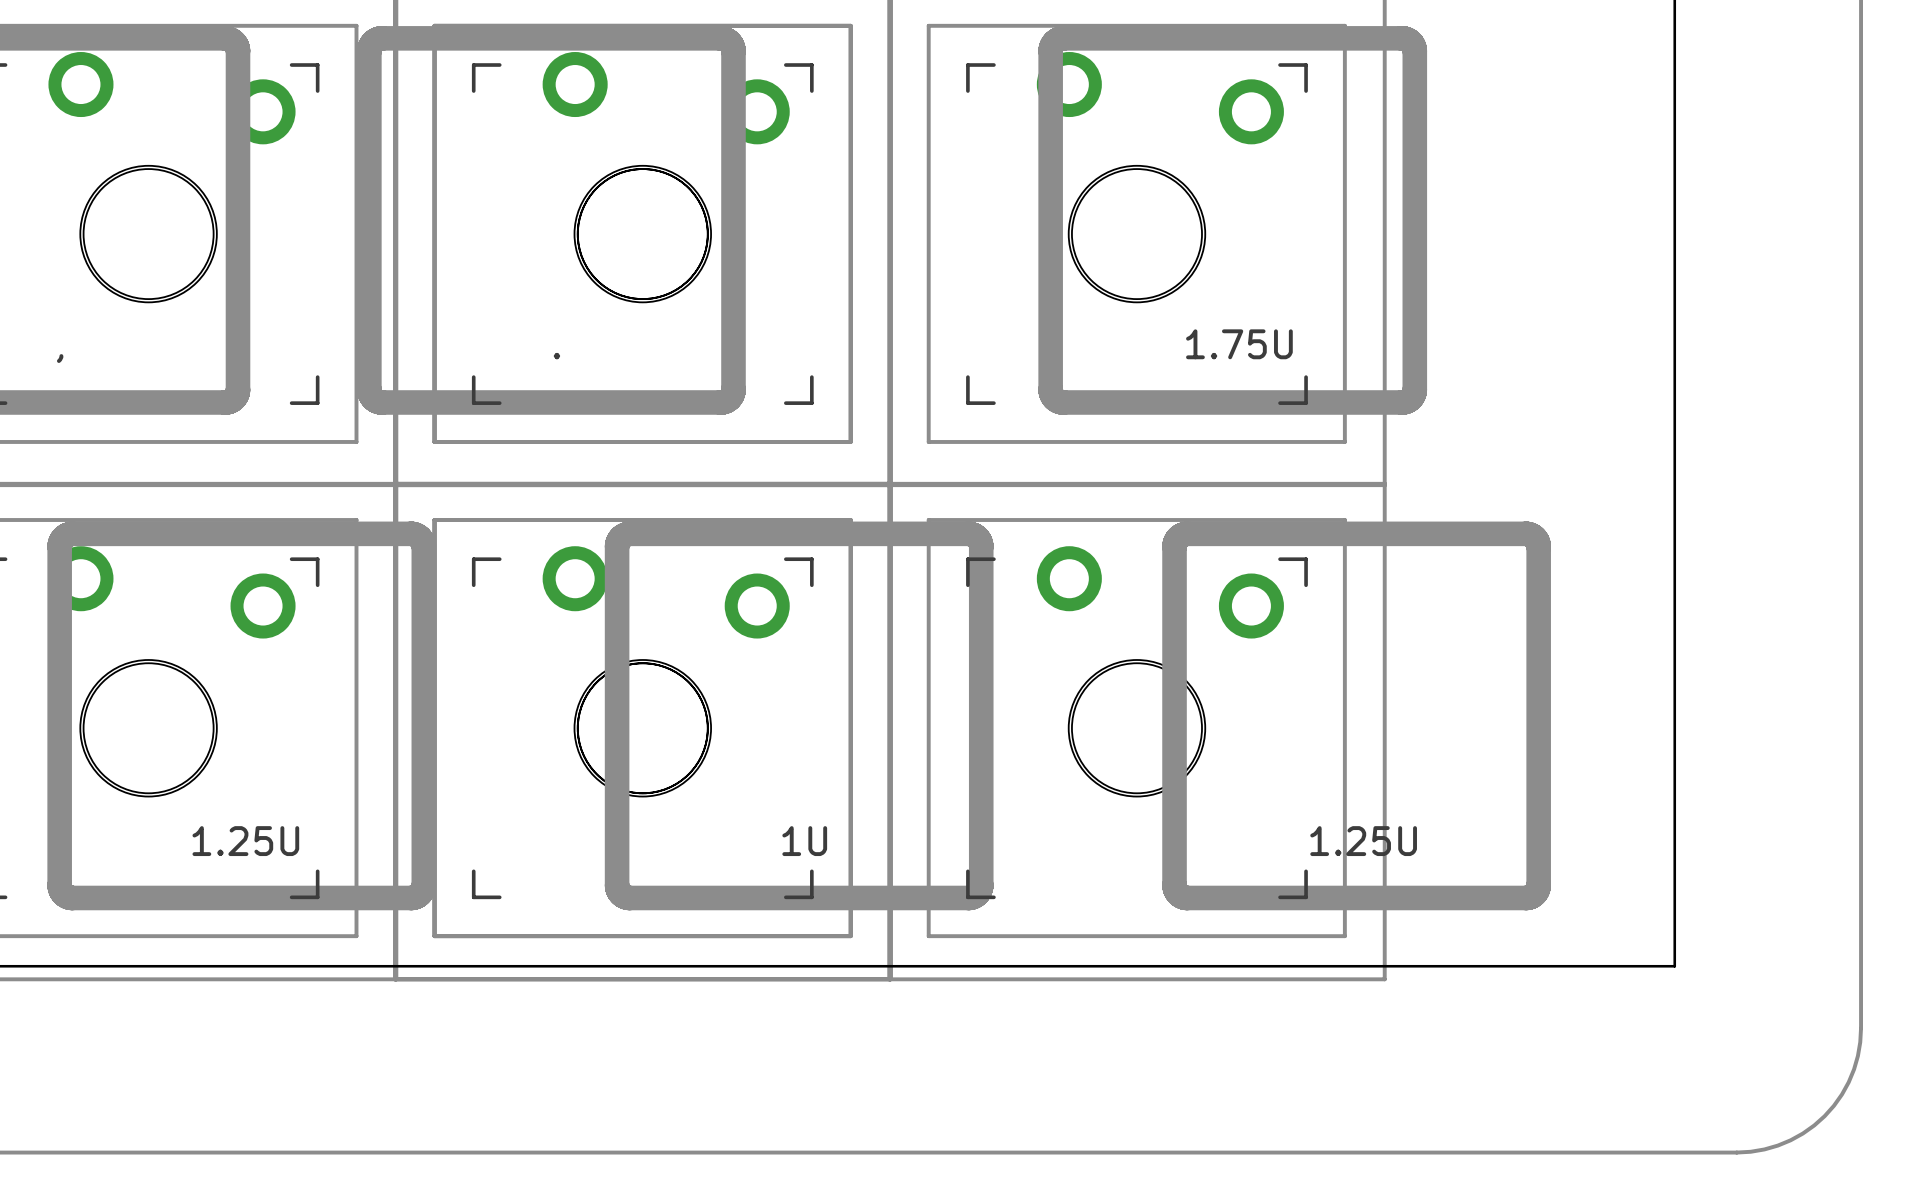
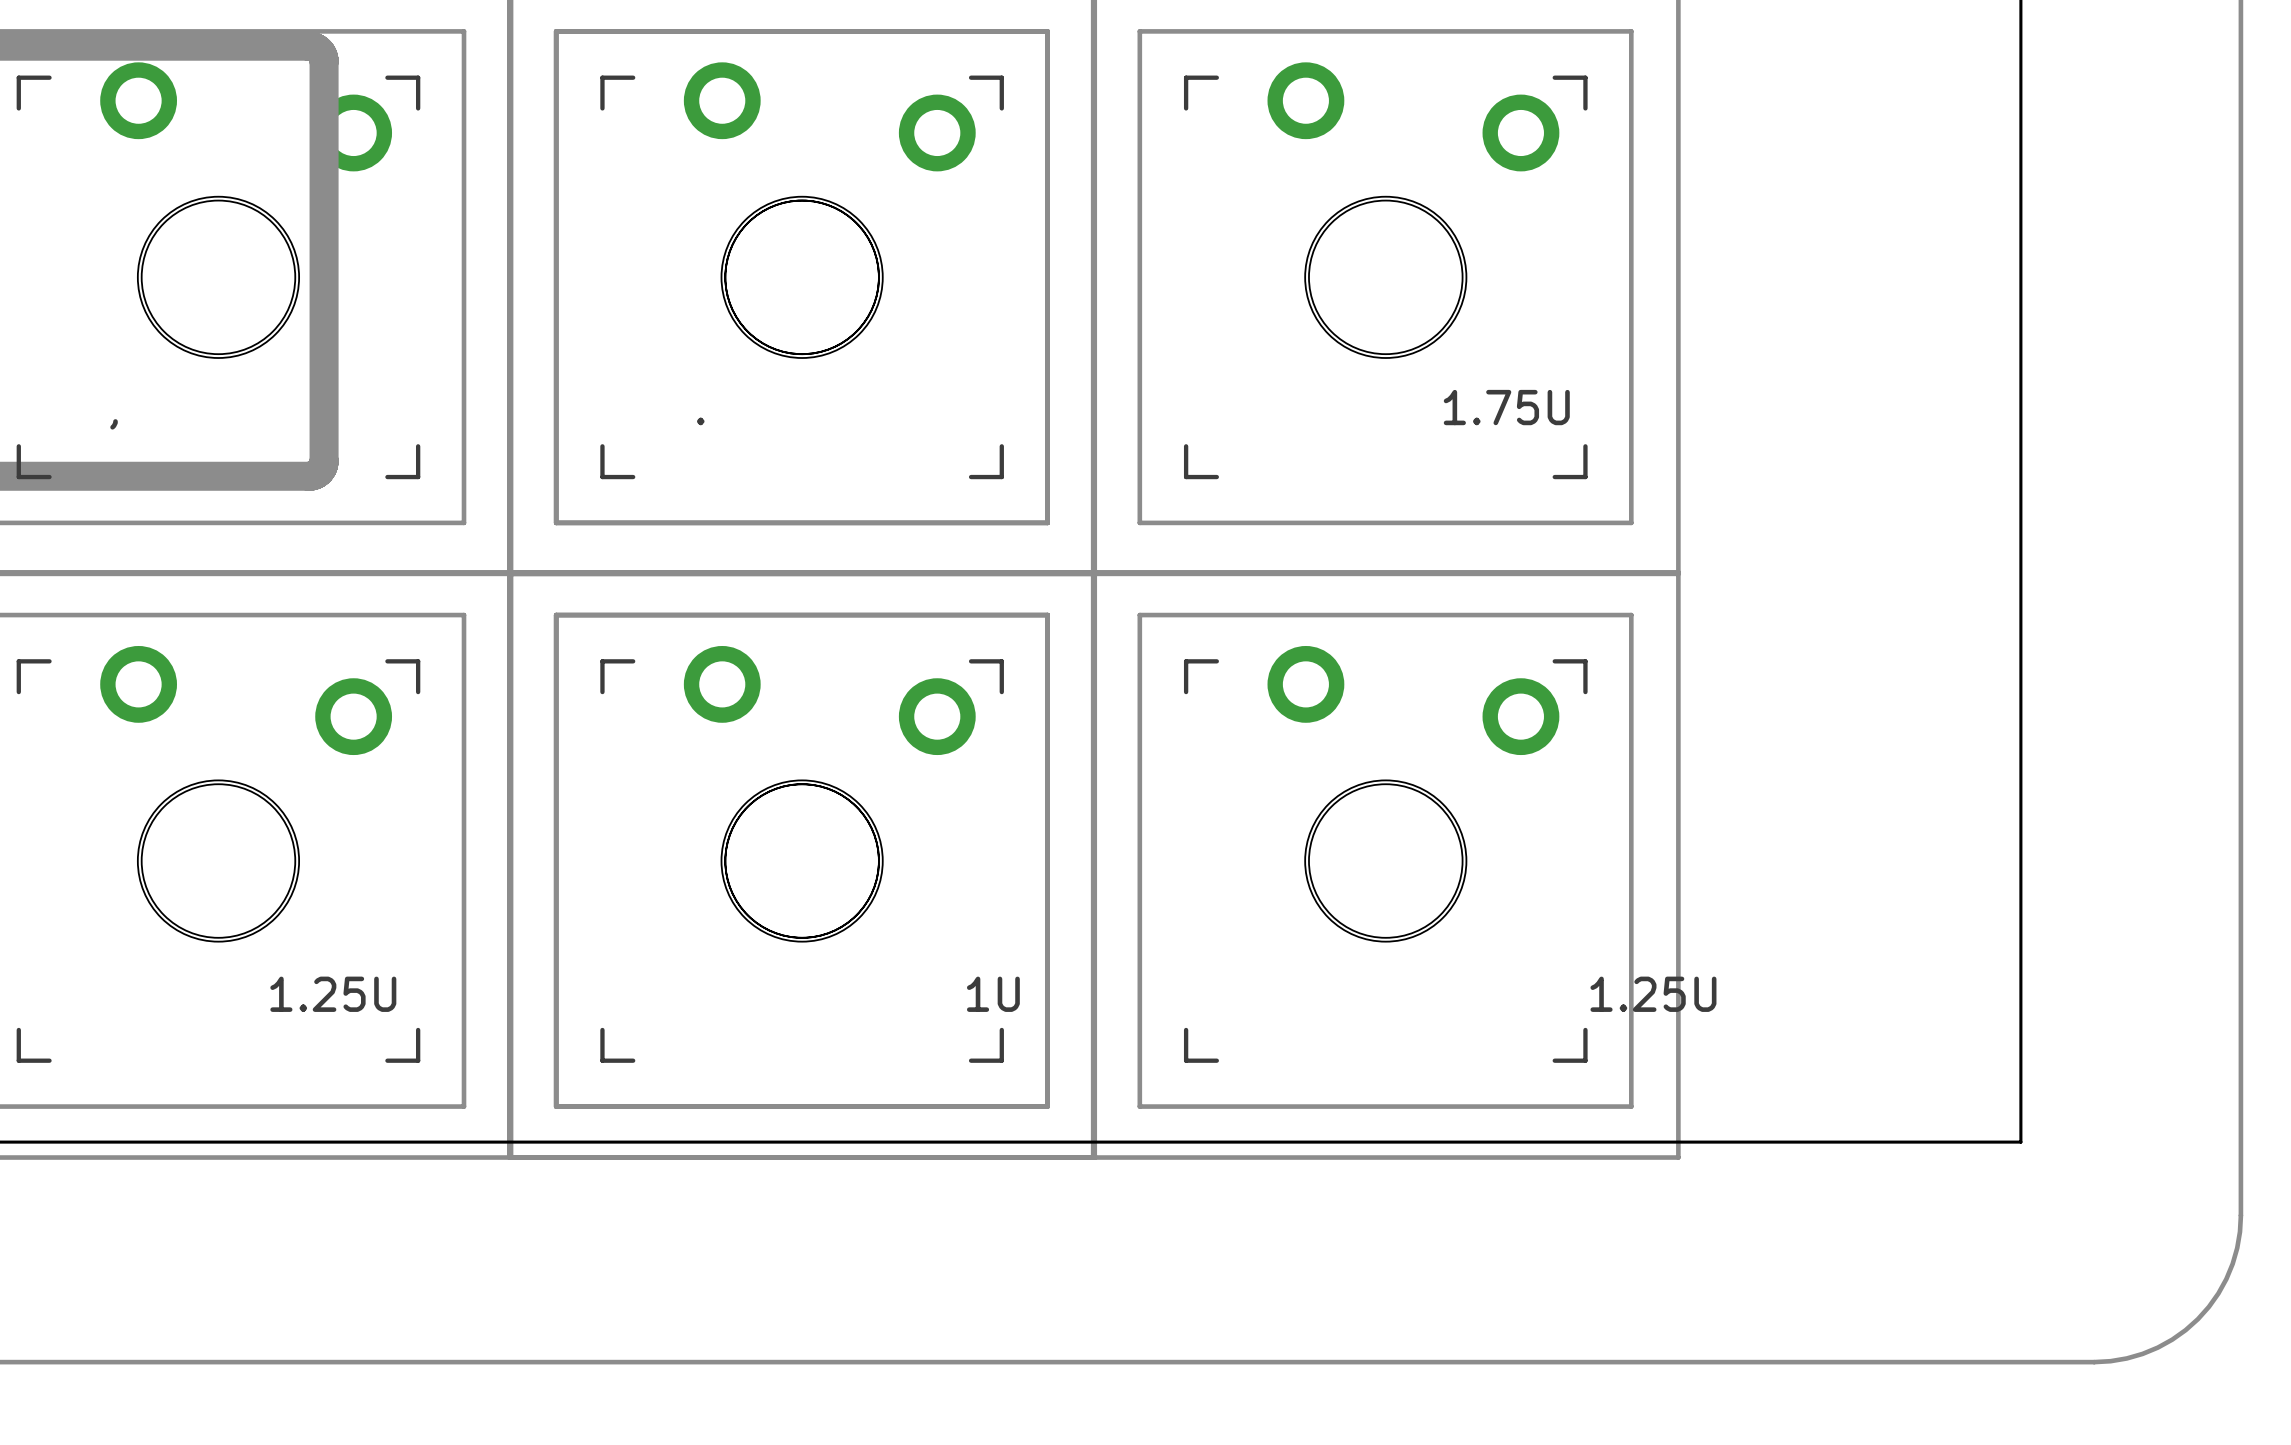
line: (382, 38) (373, 41) (369, 50) (369, 389) (373, 398) (382, 402) (720, 402) (729, 398) (733, 389) (733, 51) (729, 42) (720, 38) (382, 38) -> none
line: (1063, 38) (1054, 41) (1050, 50) (1050, 389) (1054, 398) (1063, 402) (1401, 402) (1410, 398) (1414, 389) (1414, 51) (1410, 42) (1401, 38) (1063, 38) -> none
line: (70, 534) (62, 538) (59, 546) (59, 884) (63, 894) (72, 897) (410, 897) (420, 894) (423, 884) (423, 546) (420, 537) (410, 533) (70, 534) -> none
line: (627, 534) (620, 538) (617, 546) (617, 884) (620, 894) (630, 897) (968, 897) (977, 894) (981, 884) (981, 546) (977, 537) (968, 533) (627, 534) -> none
line: (1184, 534) (1177, 538) (1174, 546) (1174, 884) (1178, 894) (1187, 897) (1525, 897) (1534, 894) (1538, 884) (1538, 546) (1534, 537) (1525, 533) (1184, 534) -> none

